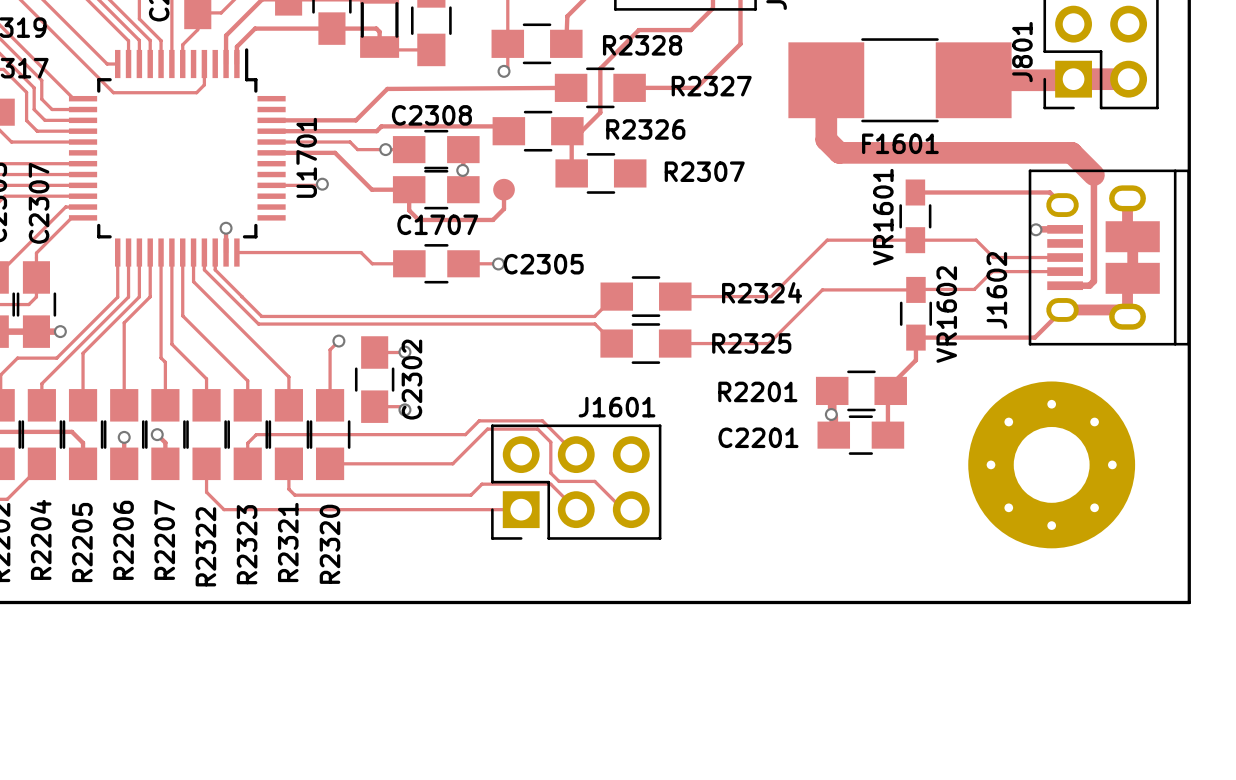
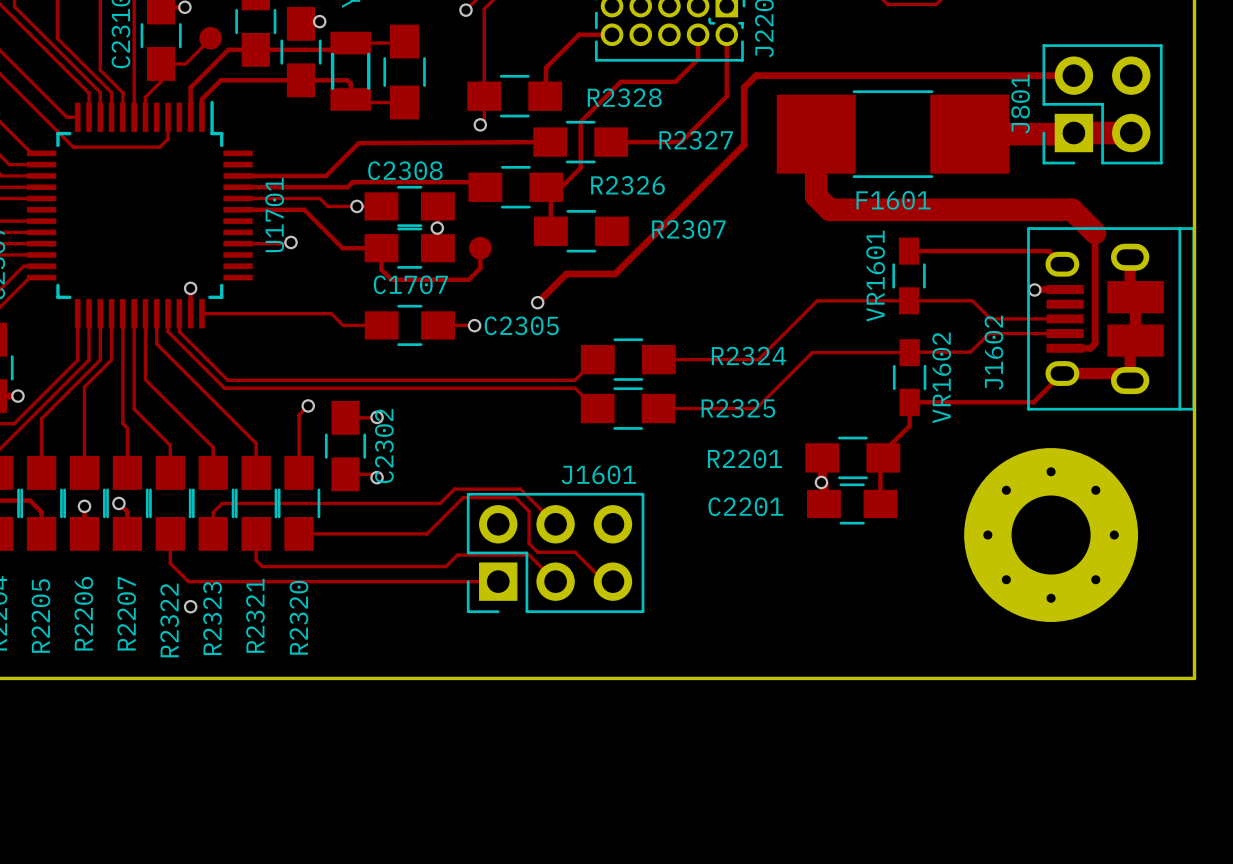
track: none -> (1073, 75) (756, 75) (744, 87) (744, 144) (615, 274) (566, 274) (537, 302)
via: none -> (537, 302)
via: none -> (190, 606)

